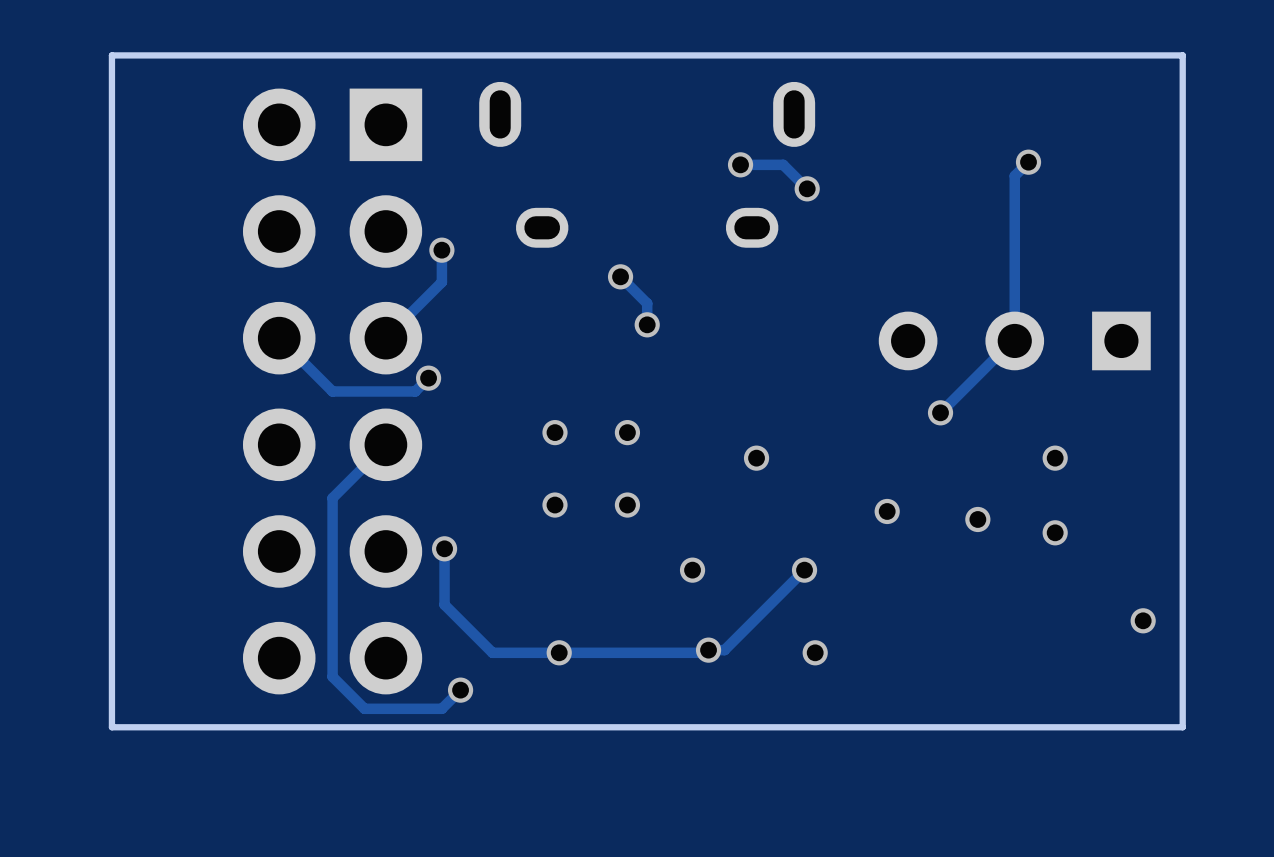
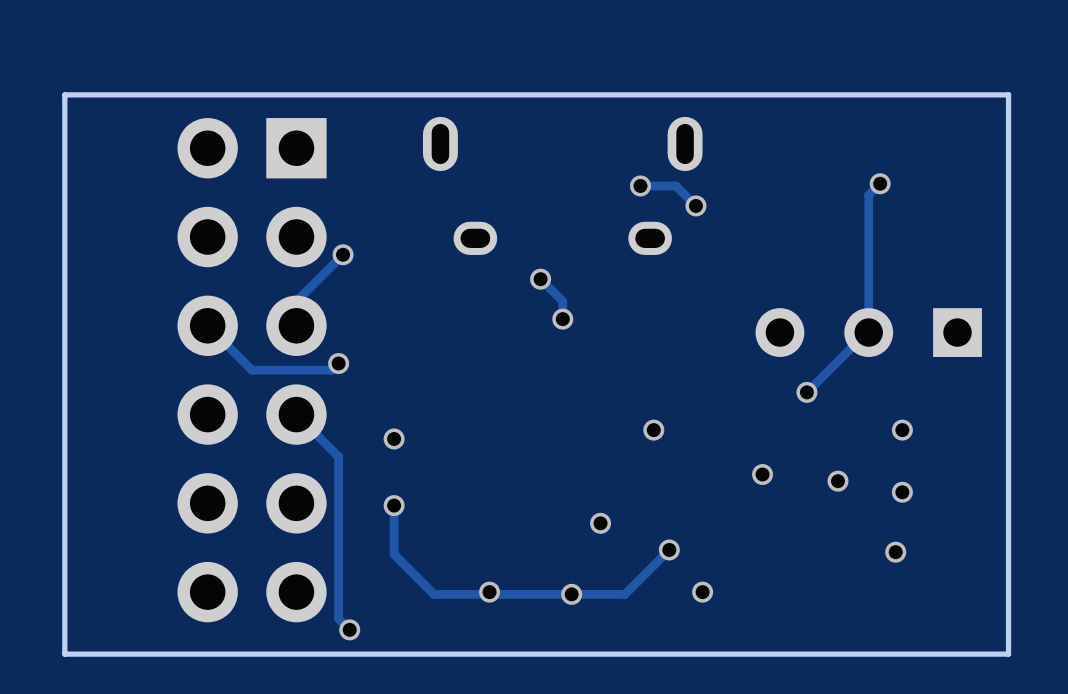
board edge: (111, 55) (111, 727) -> (117, 94) (64, 94) (64, 654) (117, 654)
track: none -> (343, 254) (296, 301) (296, 325)
track: (441, 250) (441, 282) (385, 338) -> none
via position: (441, 250) -> (343, 254)
track: none -> (207, 325) (252, 370) (331, 370) (338, 363)
track: (279, 338) (332, 391) (415, 391) (428, 378) -> none
via: none -> (338, 363)
via: (428, 378) -> none
part position: (332, 391) -> (252, 370)
via: (555, 432) -> none
via: (627, 432) -> none
track: (385, 444) (332, 498) (332, 676) (364, 708) (441, 708) (460, 690) -> none
track: none -> (296, 427) (296, 414) (338, 456) (338, 618) (349, 629)
via: none -> (394, 438)
via: (555, 505) -> none
via: (627, 505) -> none
track: (804, 570) (724, 650) (708, 650) (705, 652) (492, 652) (444, 604) -> (669, 549) (624, 594) (434, 594) (394, 554) (394, 552)
via: (804, 570) -> none
via: none -> (669, 549)
via position: (1143, 620) -> (895, 552)
via: (708, 650) -> none
via: none -> (571, 594)
via position: (460, 690) -> (349, 629)

